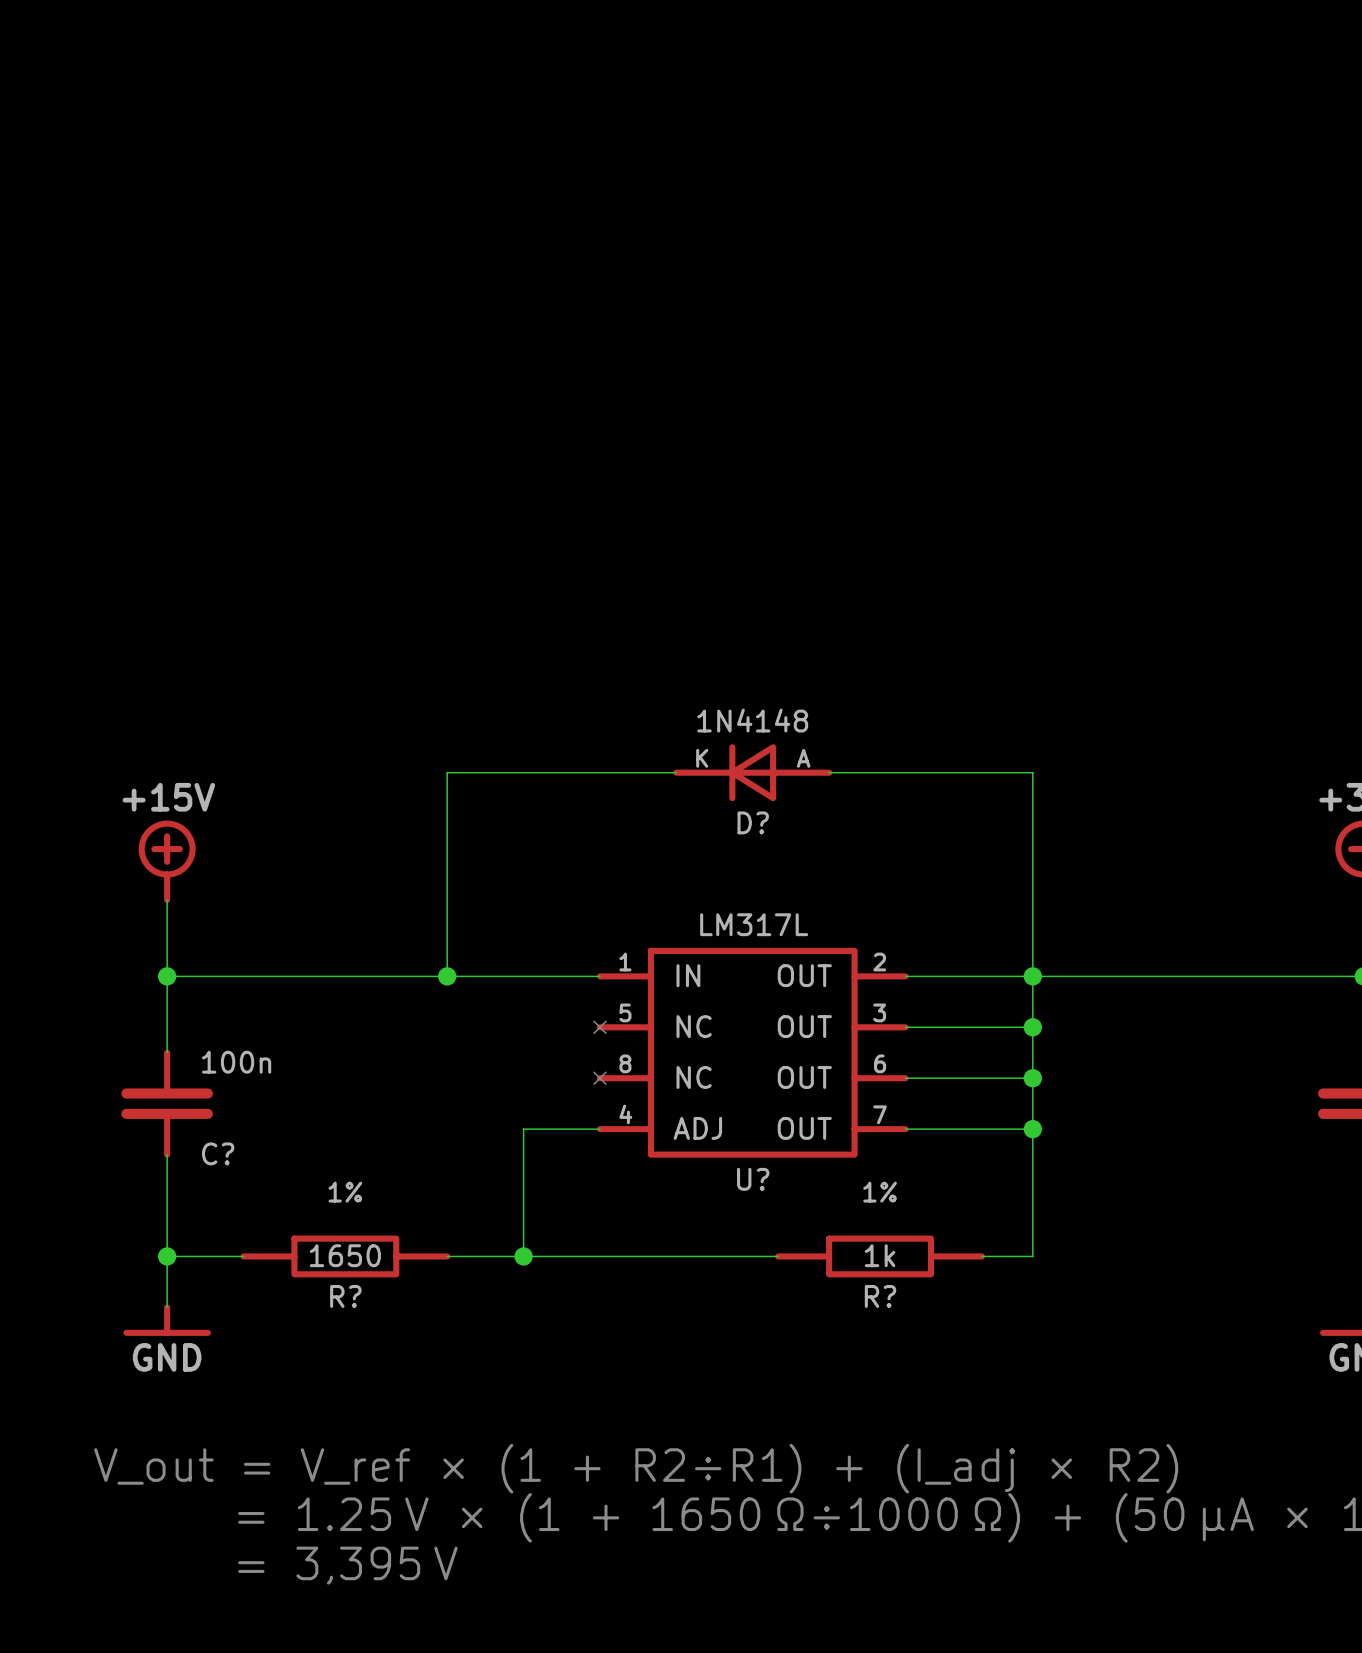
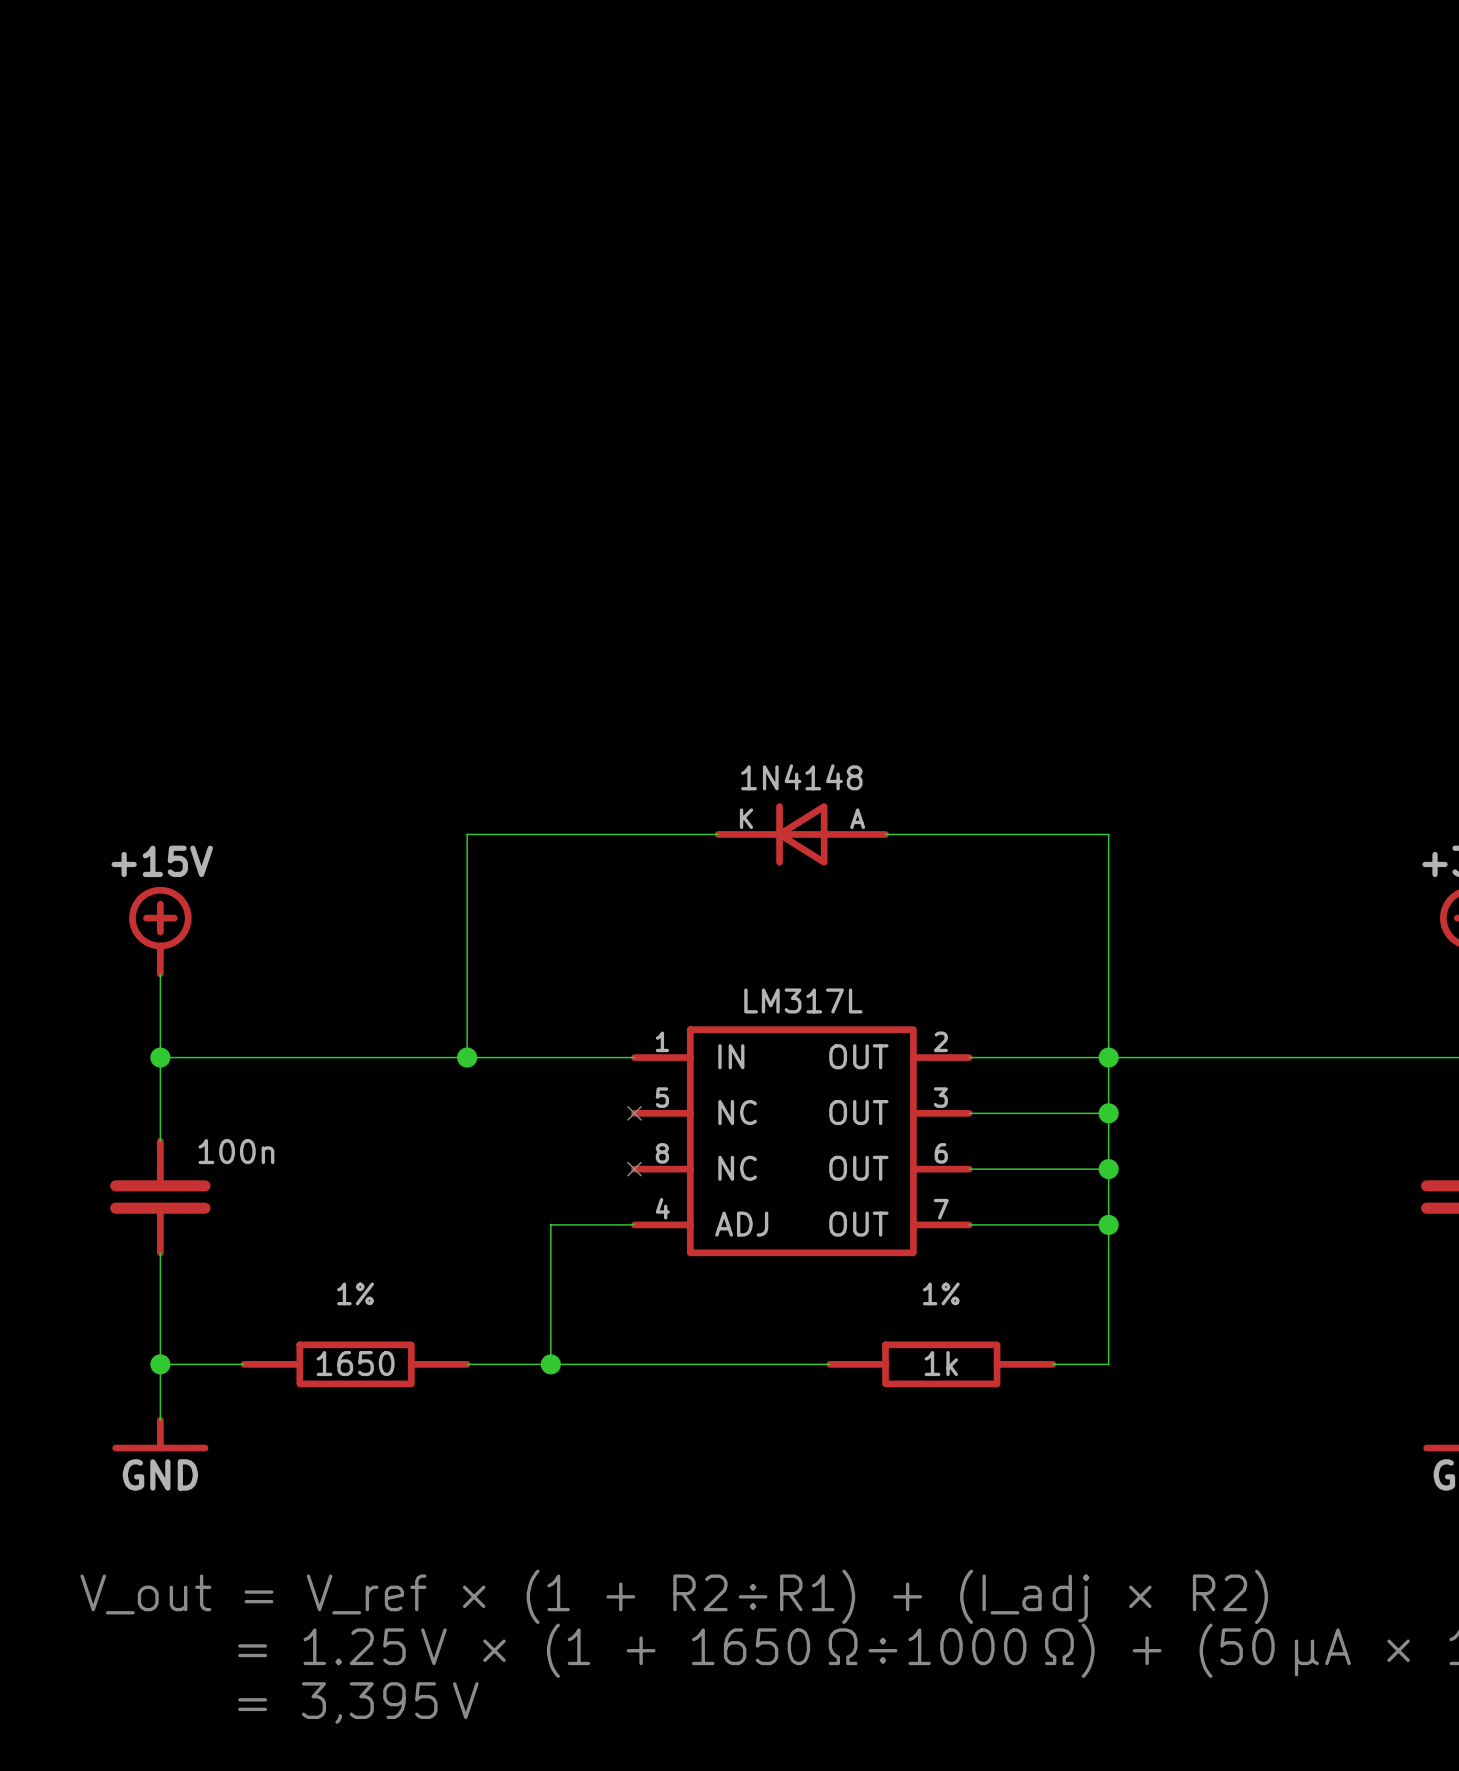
D? name: D? (753, 822) -> none
C? name: C? (218, 1153) -> none
U? name: U? (753, 1179) -> none
R? name: R? (345, 1296) -> none
R? name: R? (880, 1296) -> none

